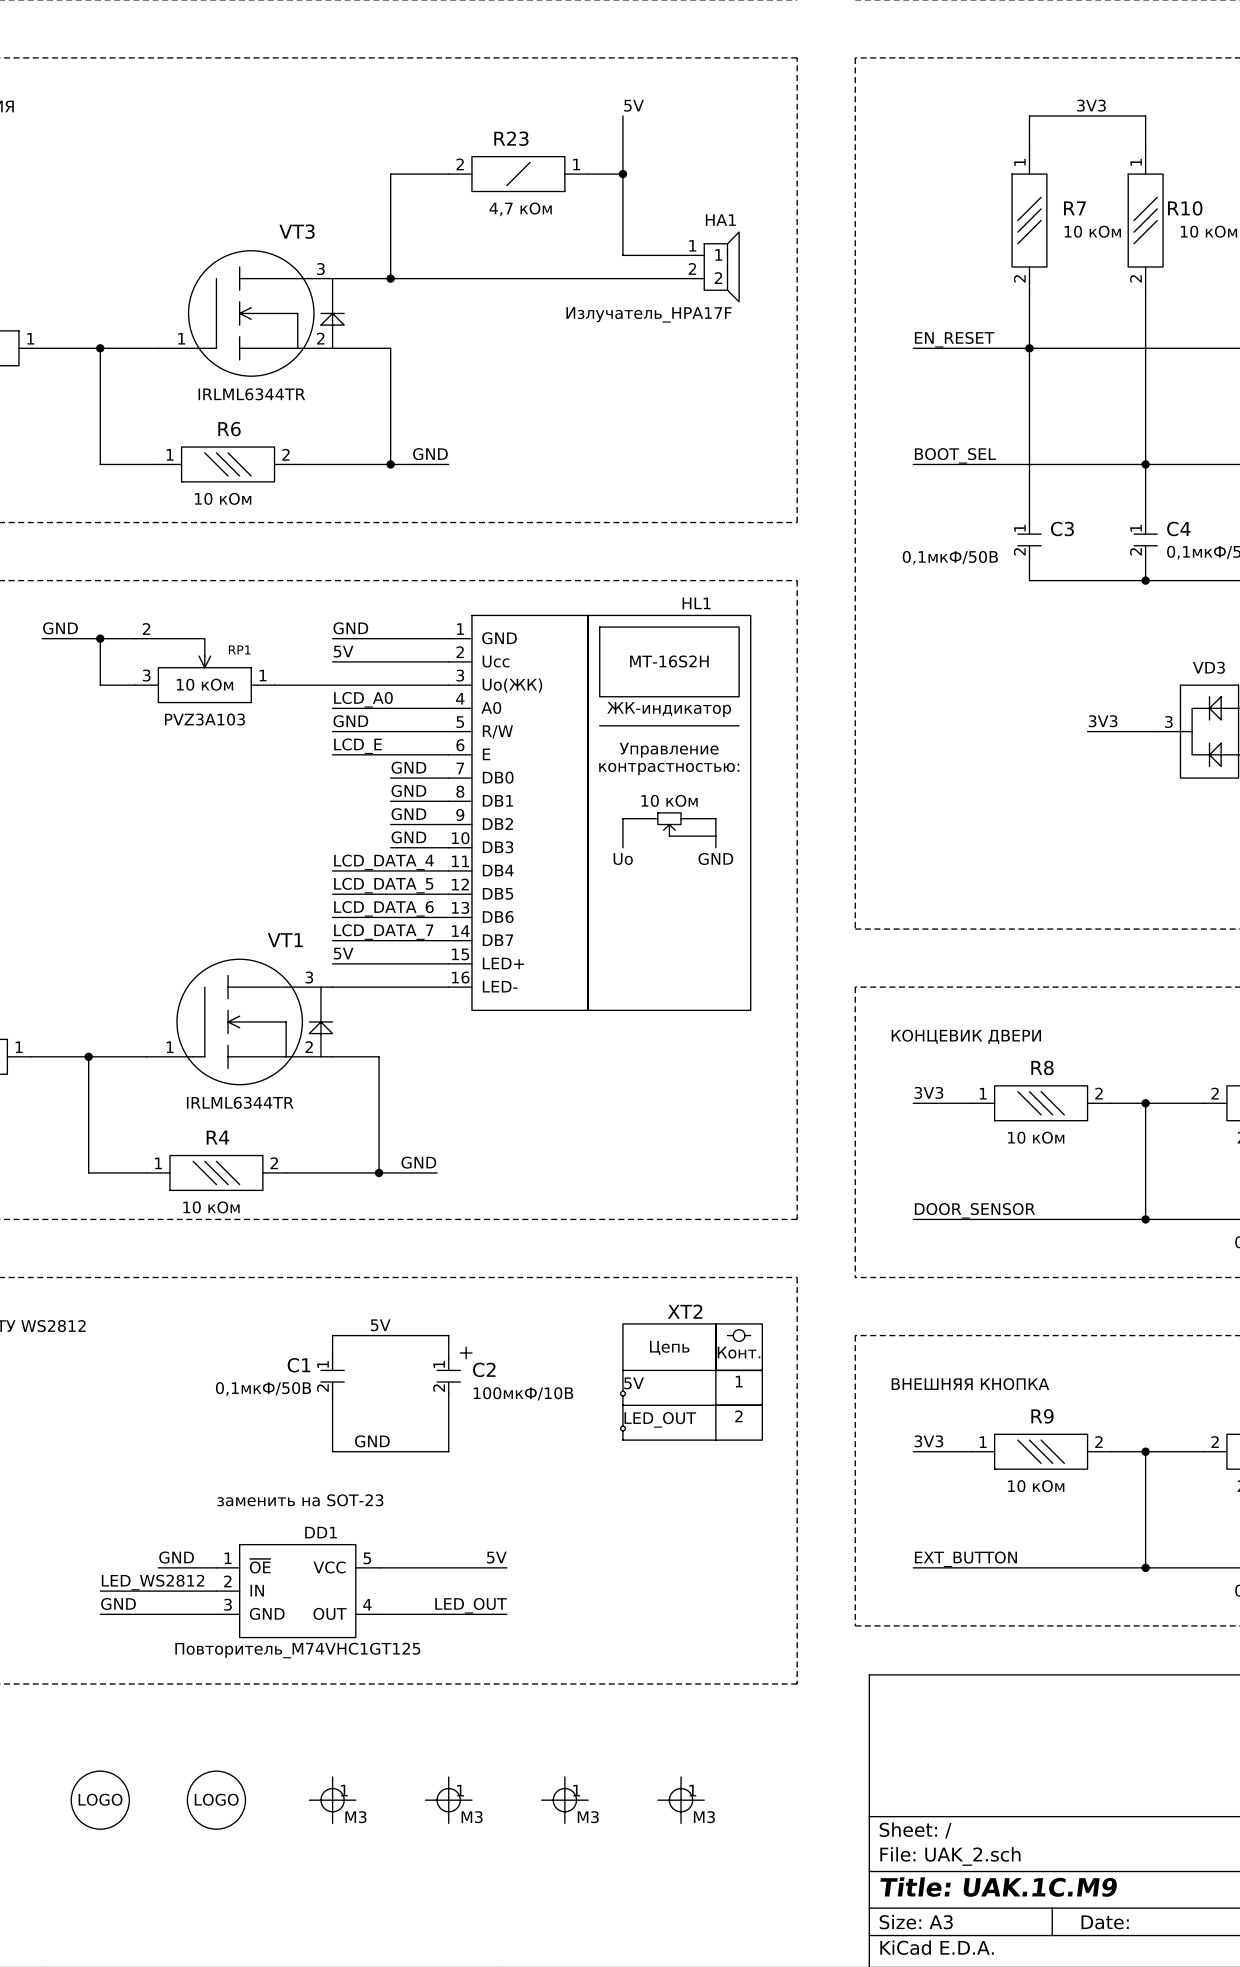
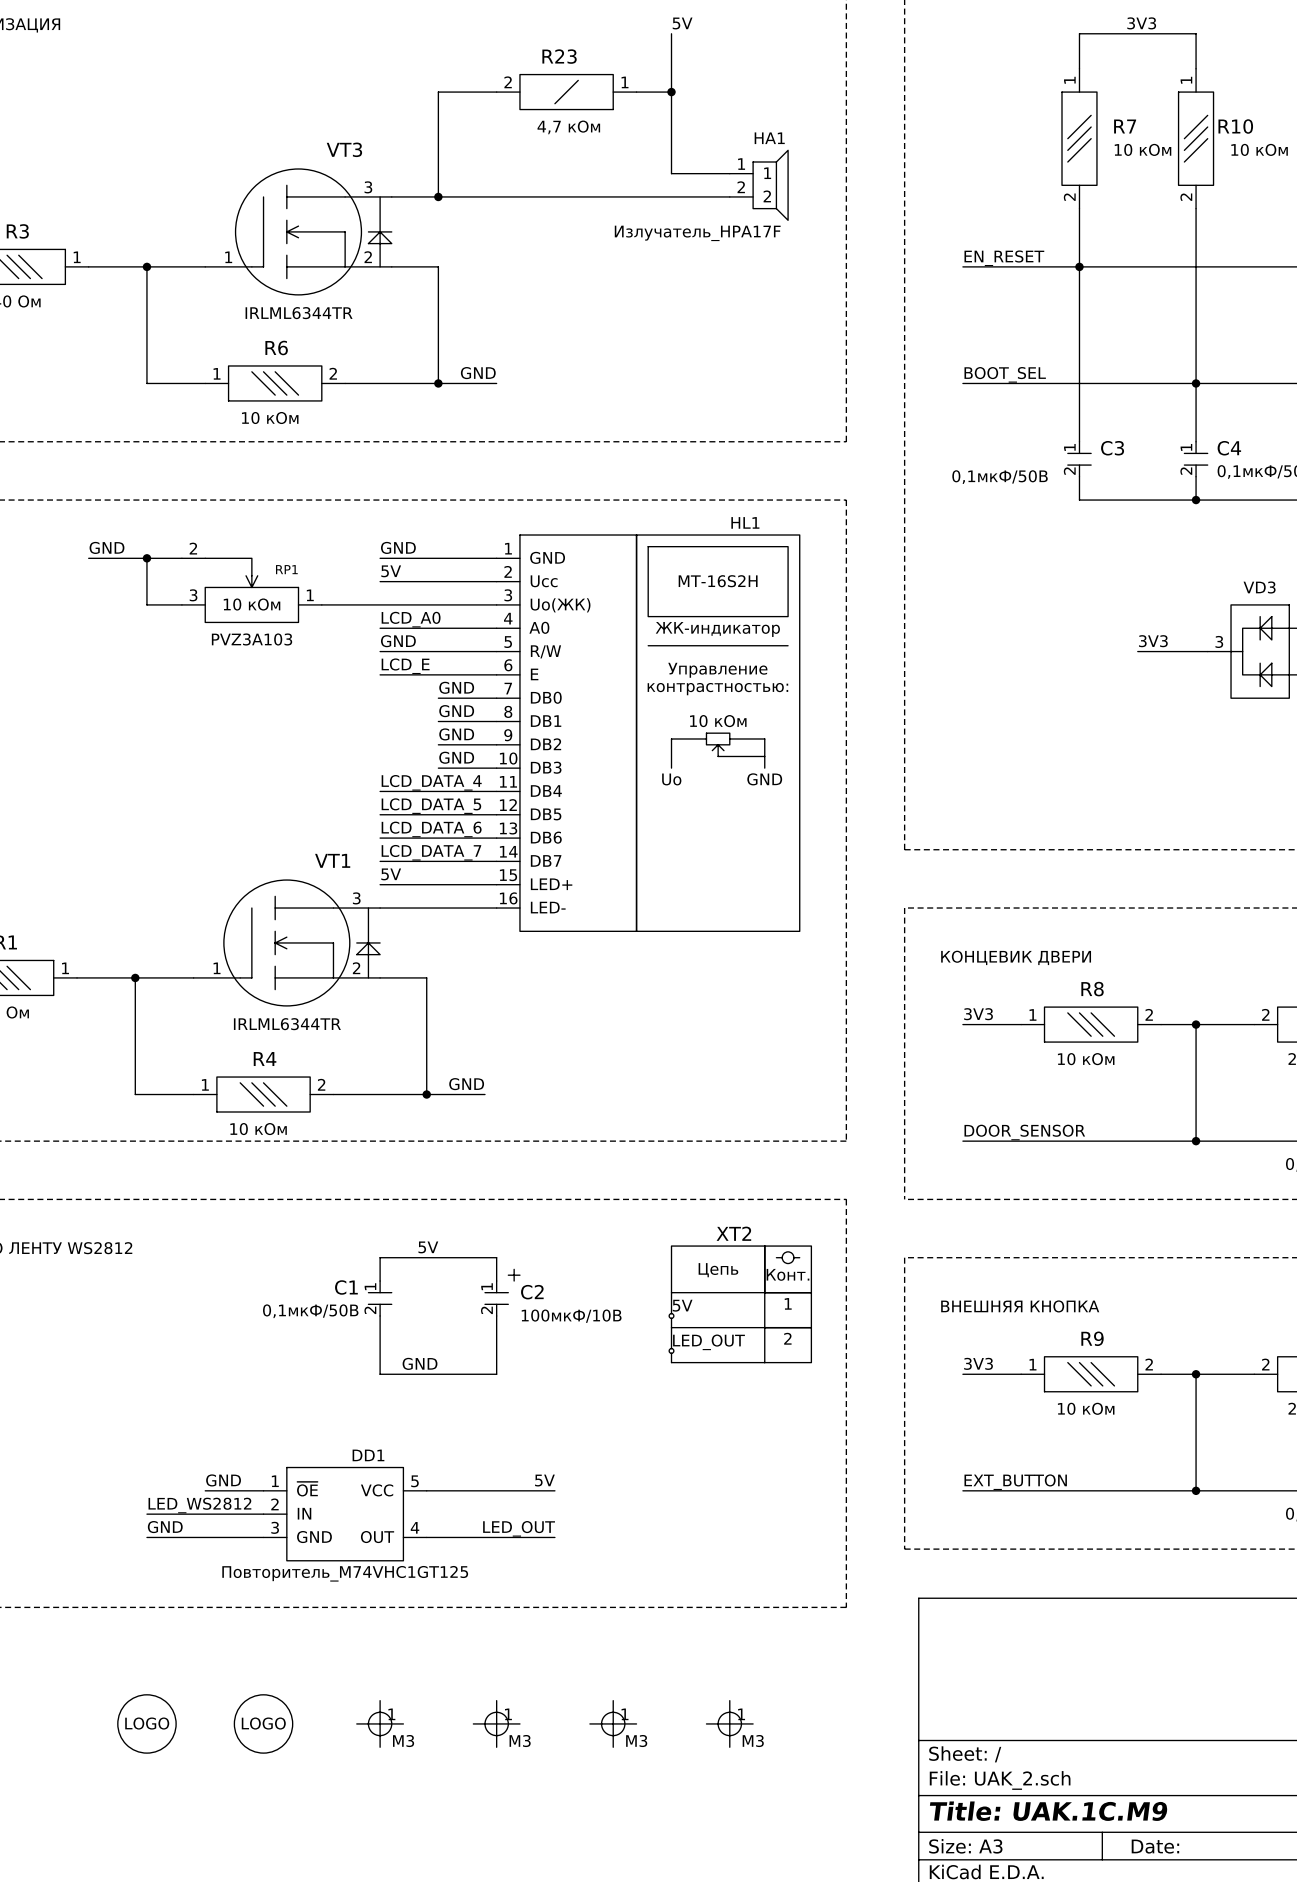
text: заменить на SOT-23 (300, 1500) -> none

